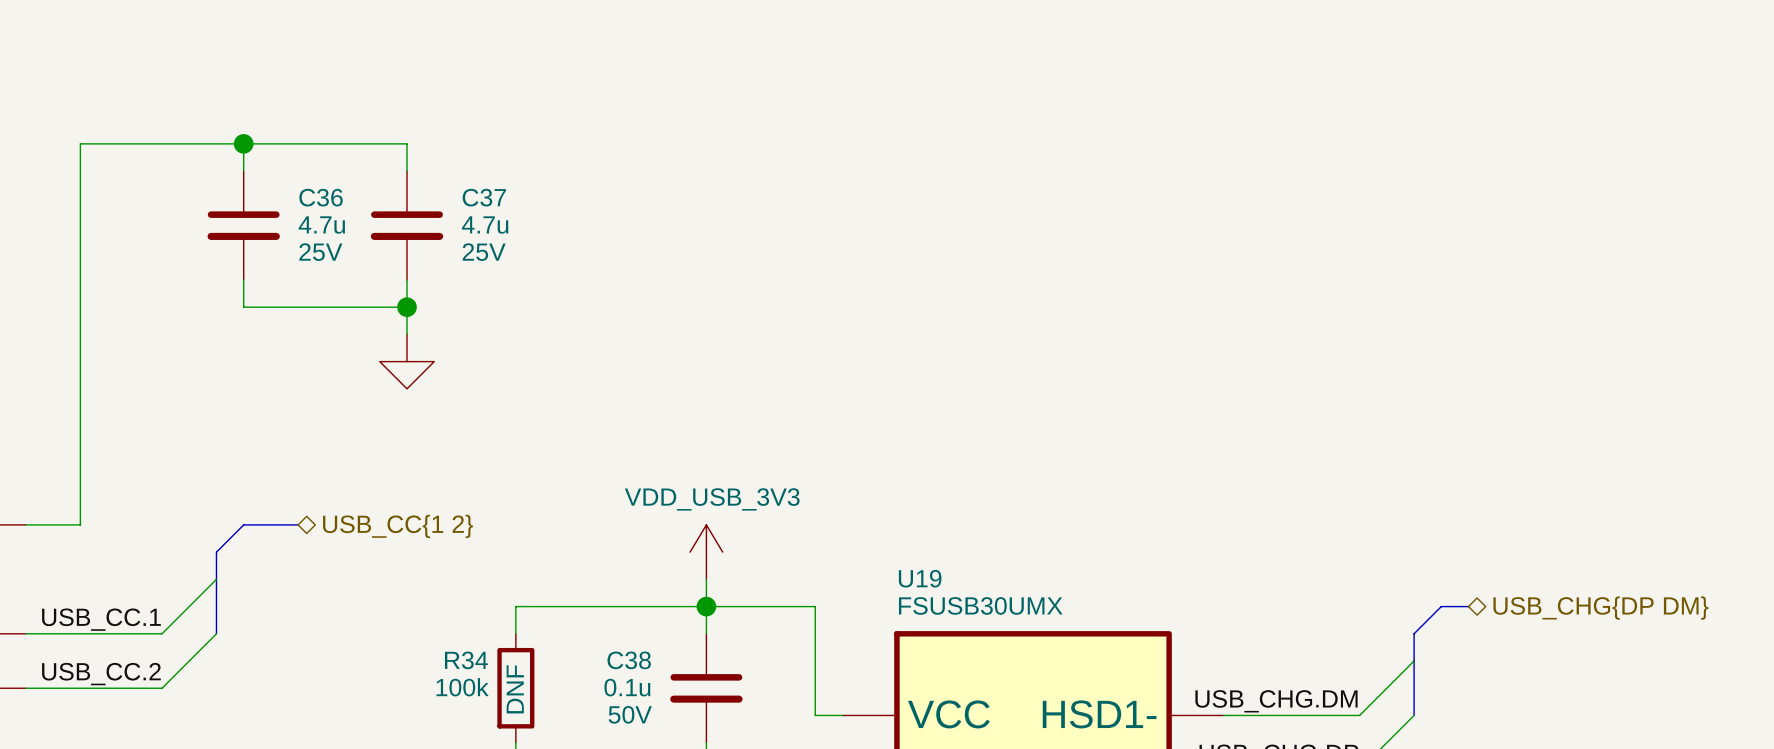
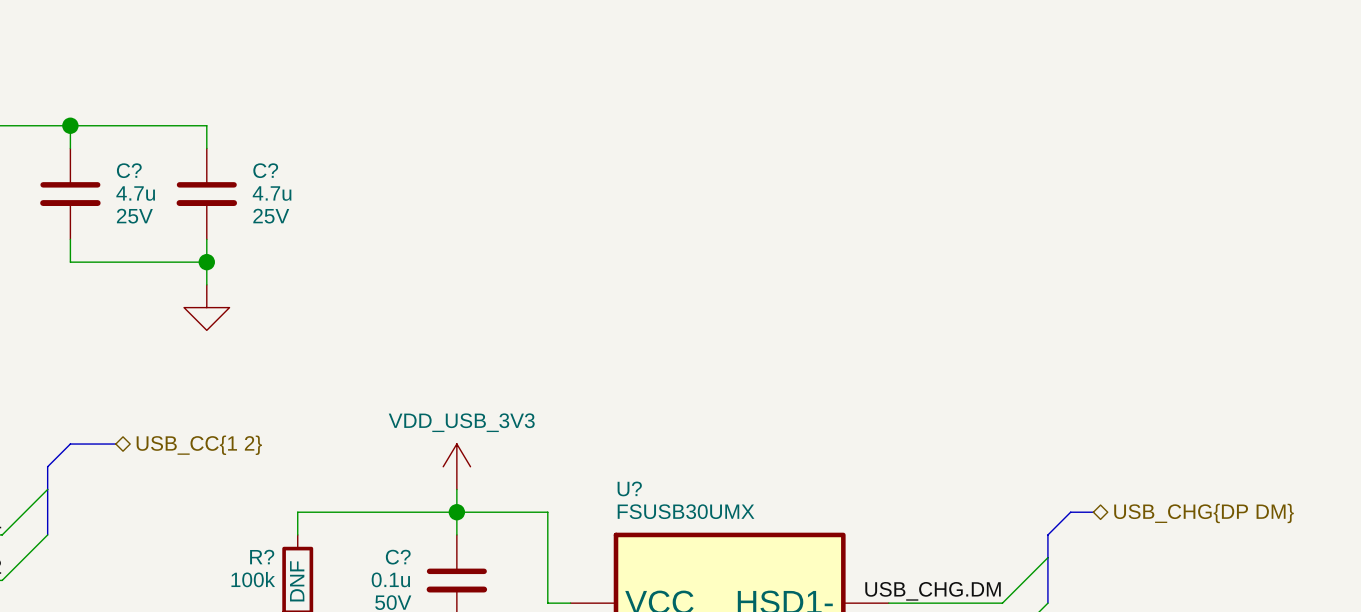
C36 name: C36 (321, 197) -> C? (129, 170)
C37 name: C37 (484, 197) -> C? (265, 170)
U19 name: U19 (920, 578) -> U? (629, 488)
R34 name: R34 (466, 660) -> R? (262, 557)
C38 name: C38 (629, 660) -> C? (398, 557)

